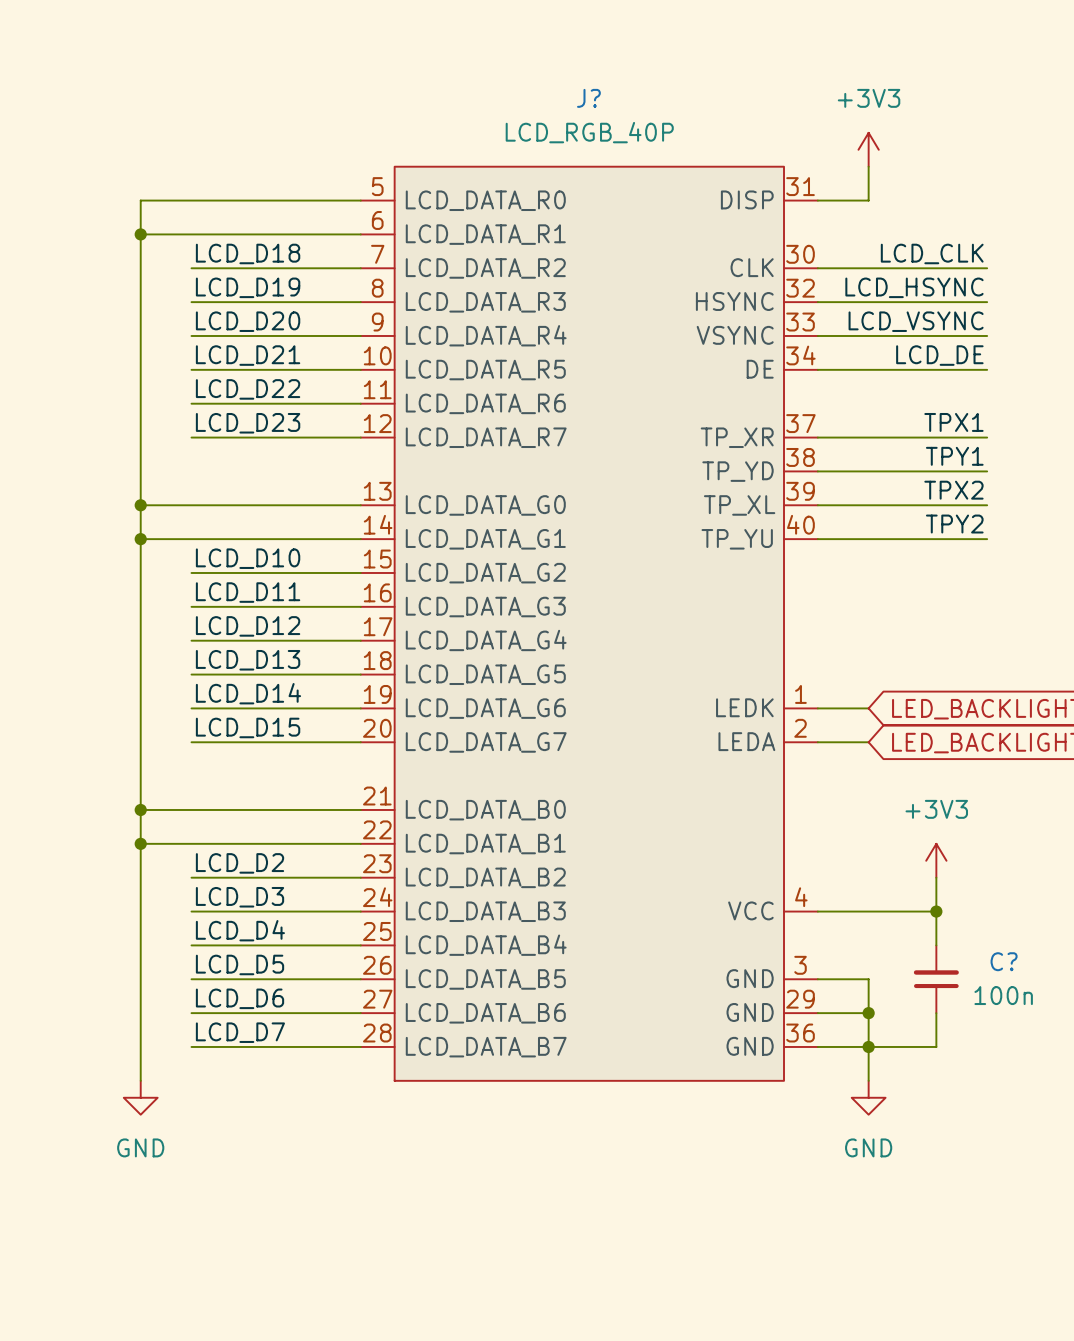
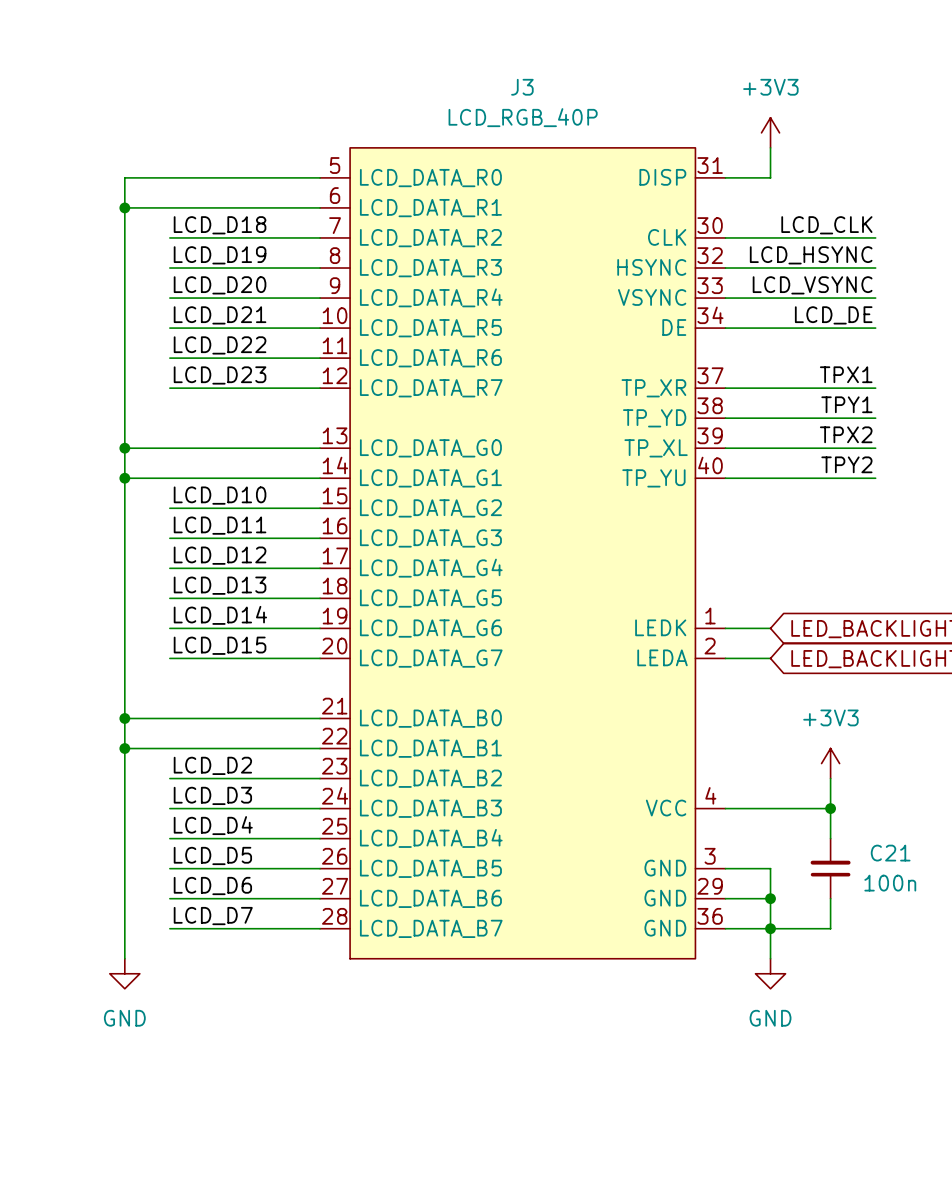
J? name: J? (588, 98) -> J3 (522, 87)
C? name: C? (1004, 961) -> C21 (890, 853)

